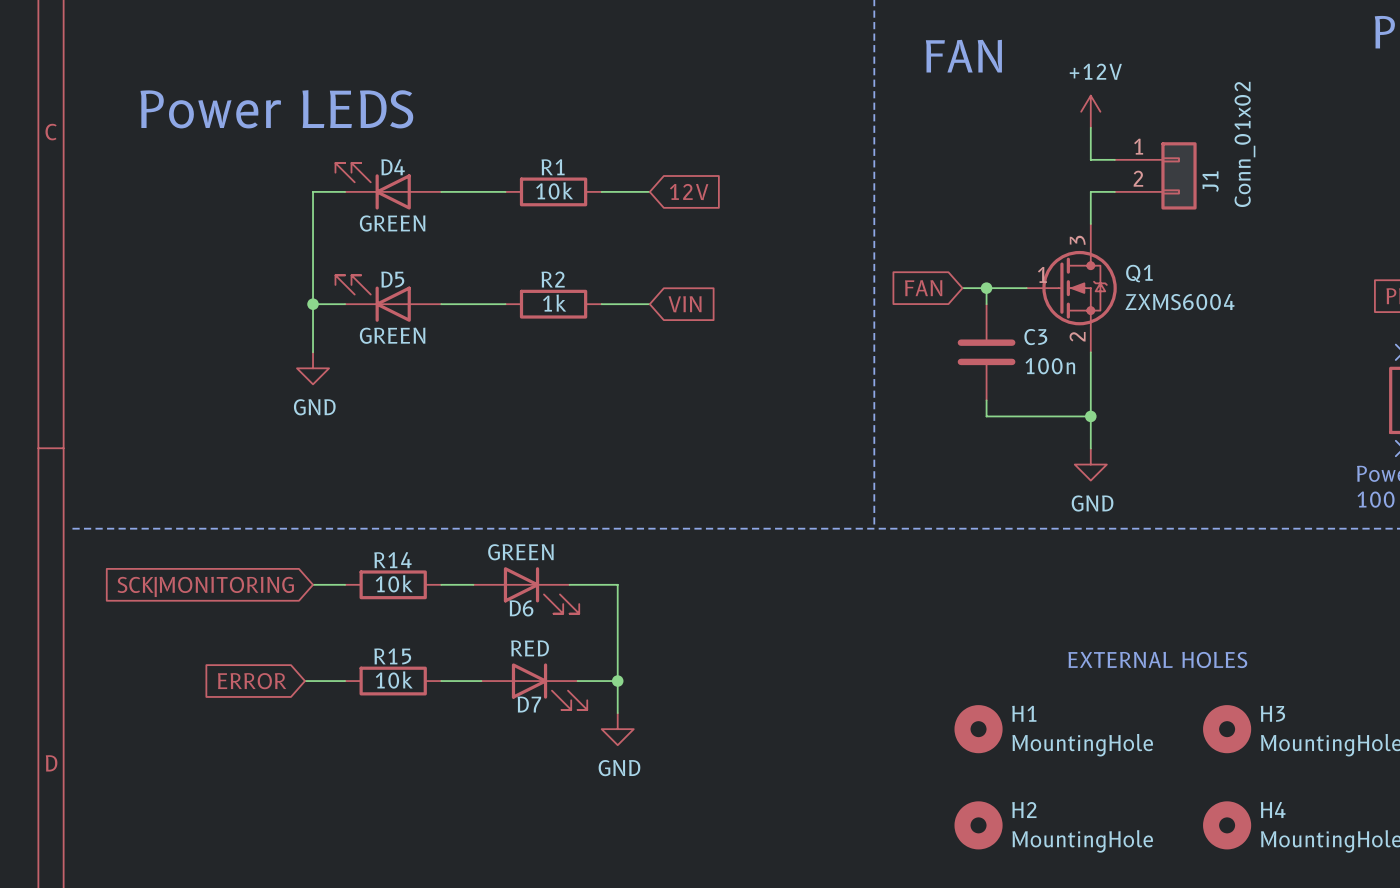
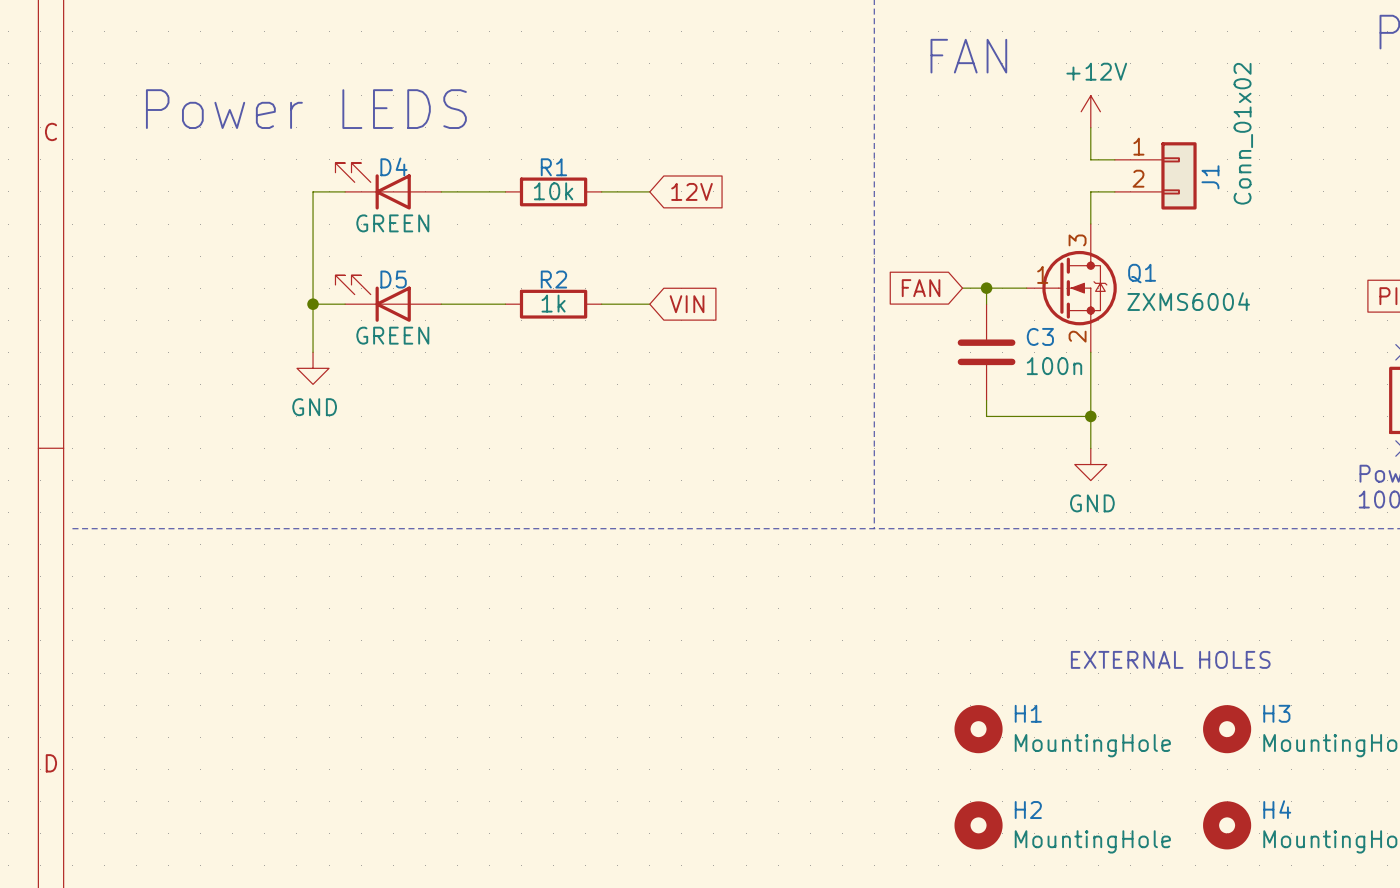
wire: (313, 584) (345, 584) -> none
R14: 10k (393, 584) -> none
wire: (441, 584) (473, 584) -> none
wire: (569, 584) (617, 584) (617, 713) -> none
global label: SCK|MONITORING (205, 586) -> none
D6: GREEN (526, 590) -> none
global label: ERROR (252, 681) -> none
wire: (305, 681) (345, 681) -> none
R15: 10k (393, 681) -> none
wire: (441, 681) (481, 681) -> none
wire: (577, 681) (617, 681) -> none
junction: (617, 681) -> none
D7: RED (534, 686) -> none
power symbol: GND (617, 729) -> none

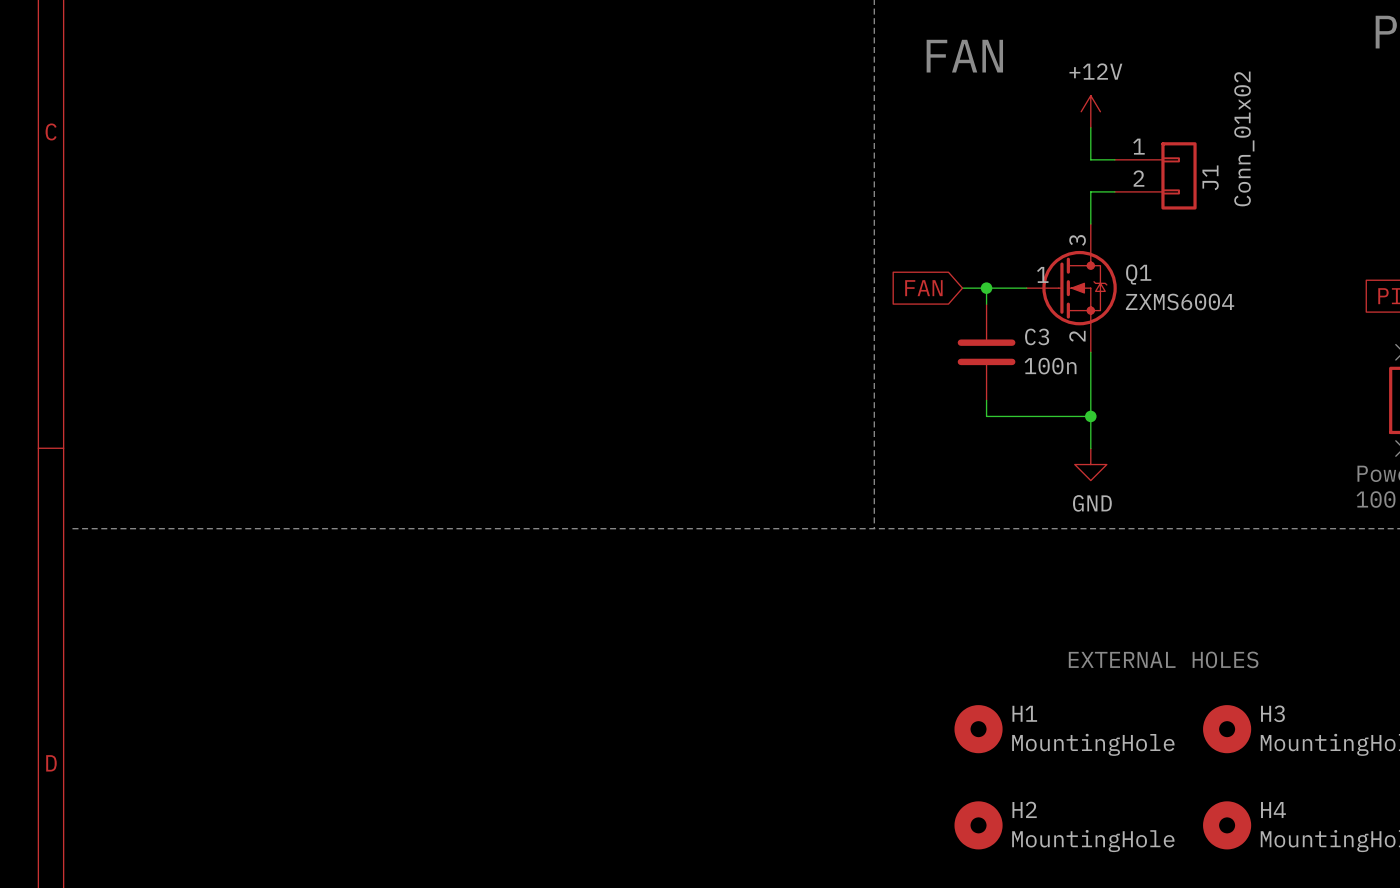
text: Power LEDS (306, 109) -> none
D4: GREEN (388, 186) -> none
wire: (345, 191) (313, 191) (313, 352) -> none
wire: (441, 191) (505, 191) -> none
R1: 10k (553, 191) -> none
wire: (601, 191) (649, 191) -> none
global label: 12V (692, 191) -> none
D5: GREEN (388, 298) -> none
wire: (313, 304) (345, 304) -> none
junction: (313, 304) -> none
wire: (441, 304) (505, 304) -> none
R2: 1k (553, 304) -> none
wire: (601, 304) (649, 304) -> none
global label: VIN (687, 304) -> none
power symbol: GND (313, 368) -> none

